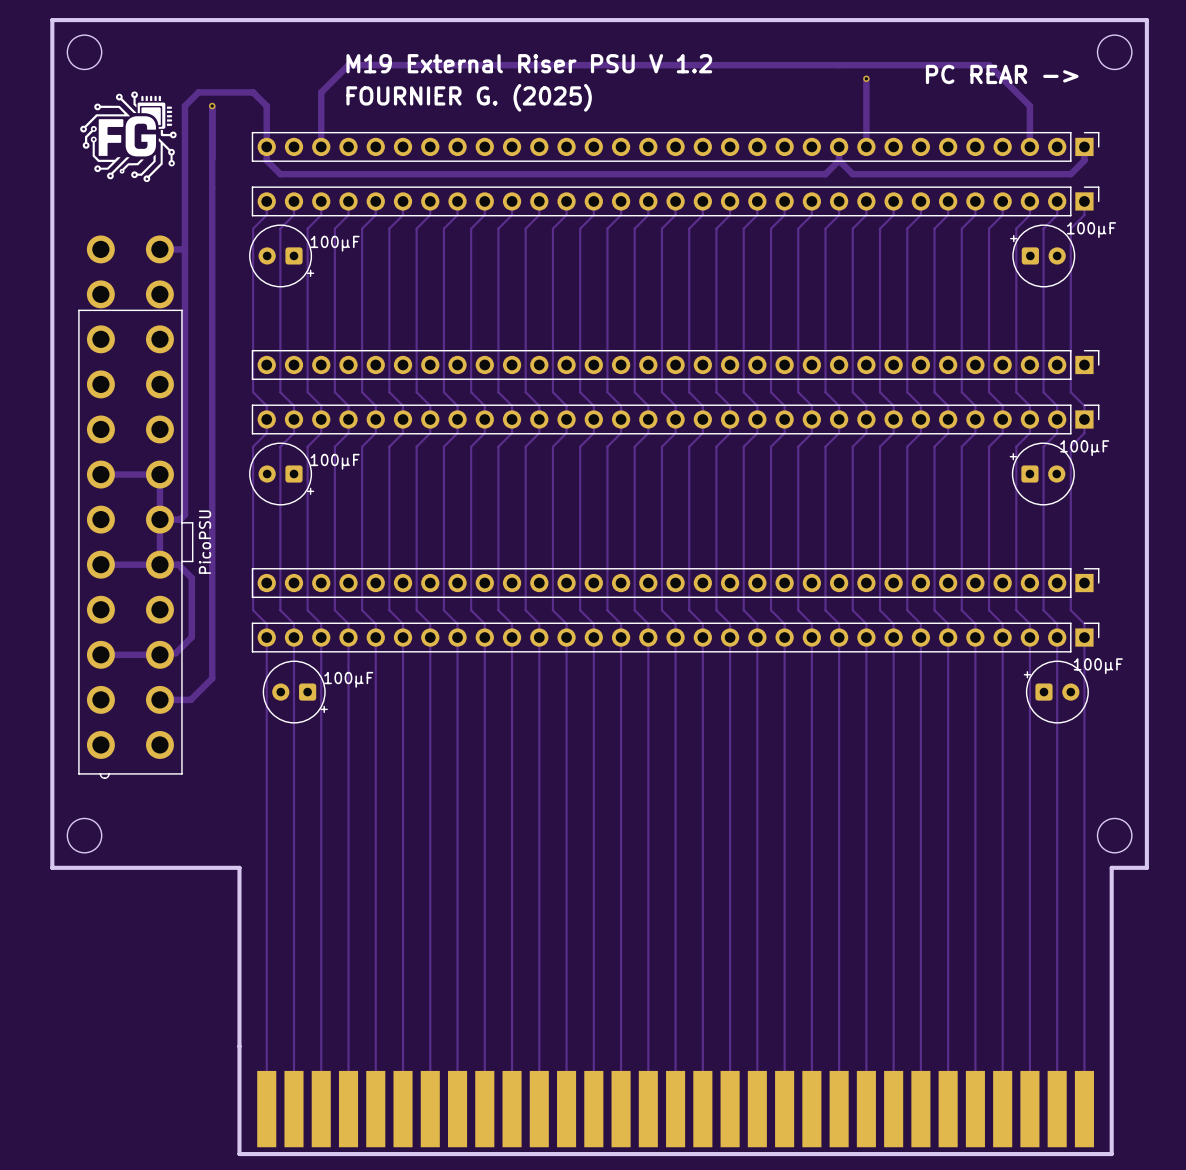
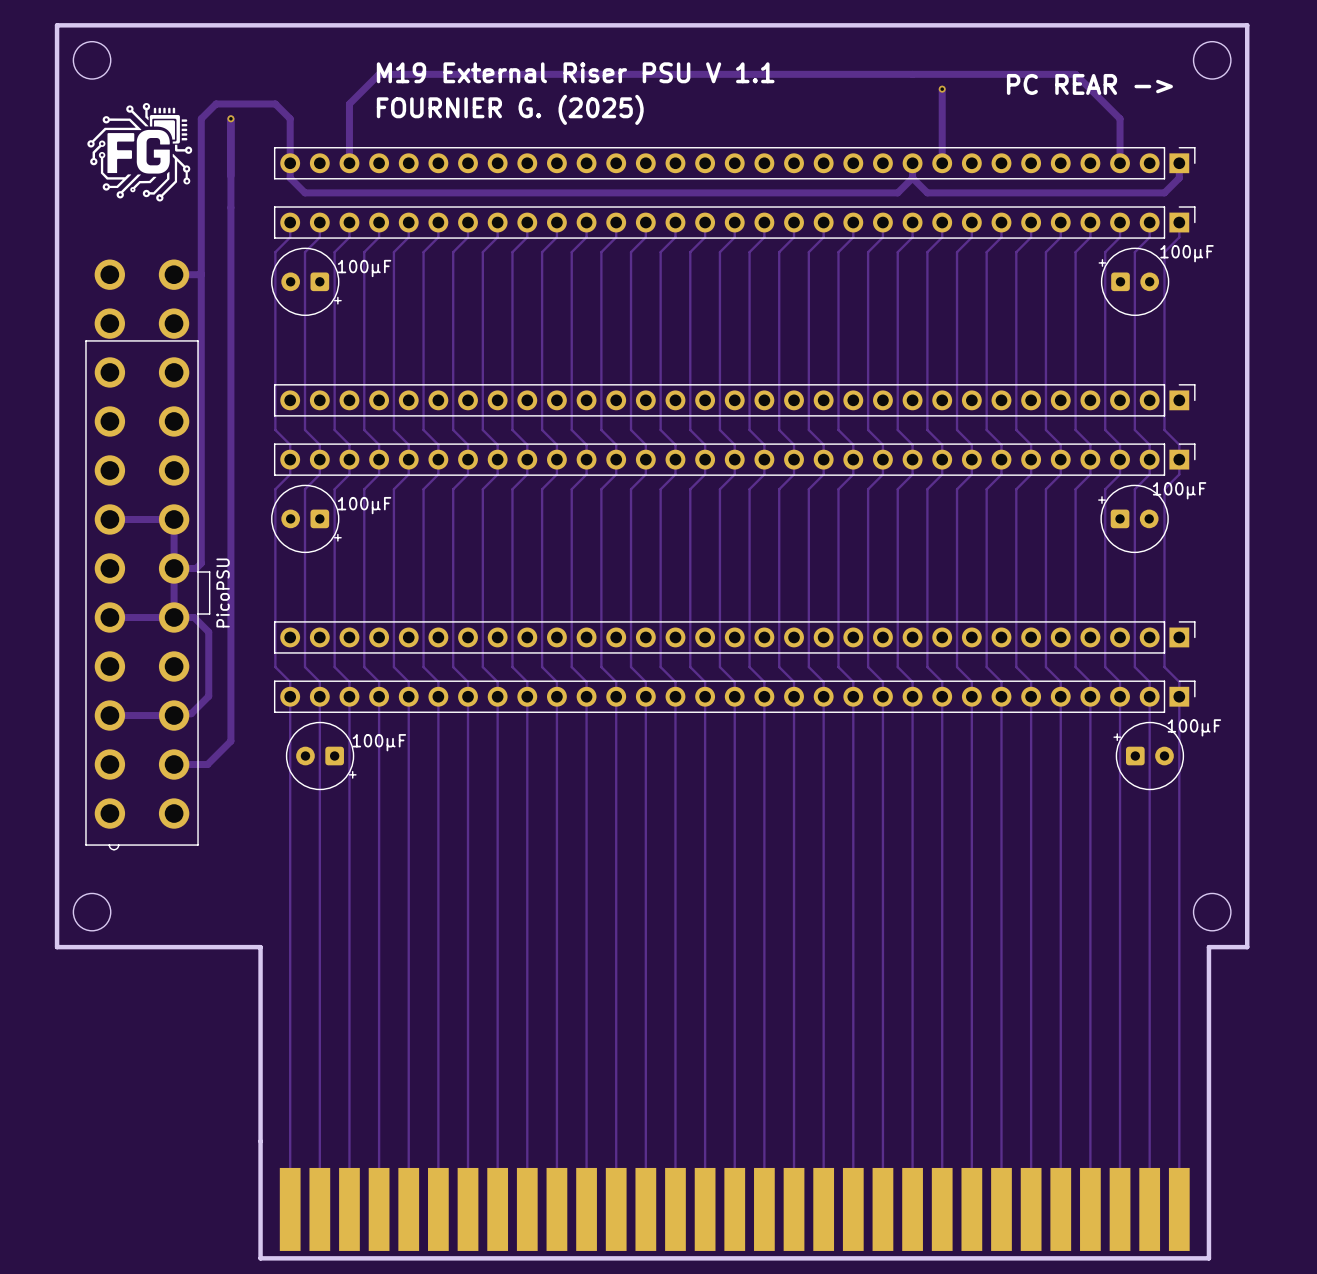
text: M19 External Riser PSU V 1.2 (529, 63) -> M19 External Riser PSU V 1.1 (575, 72)

